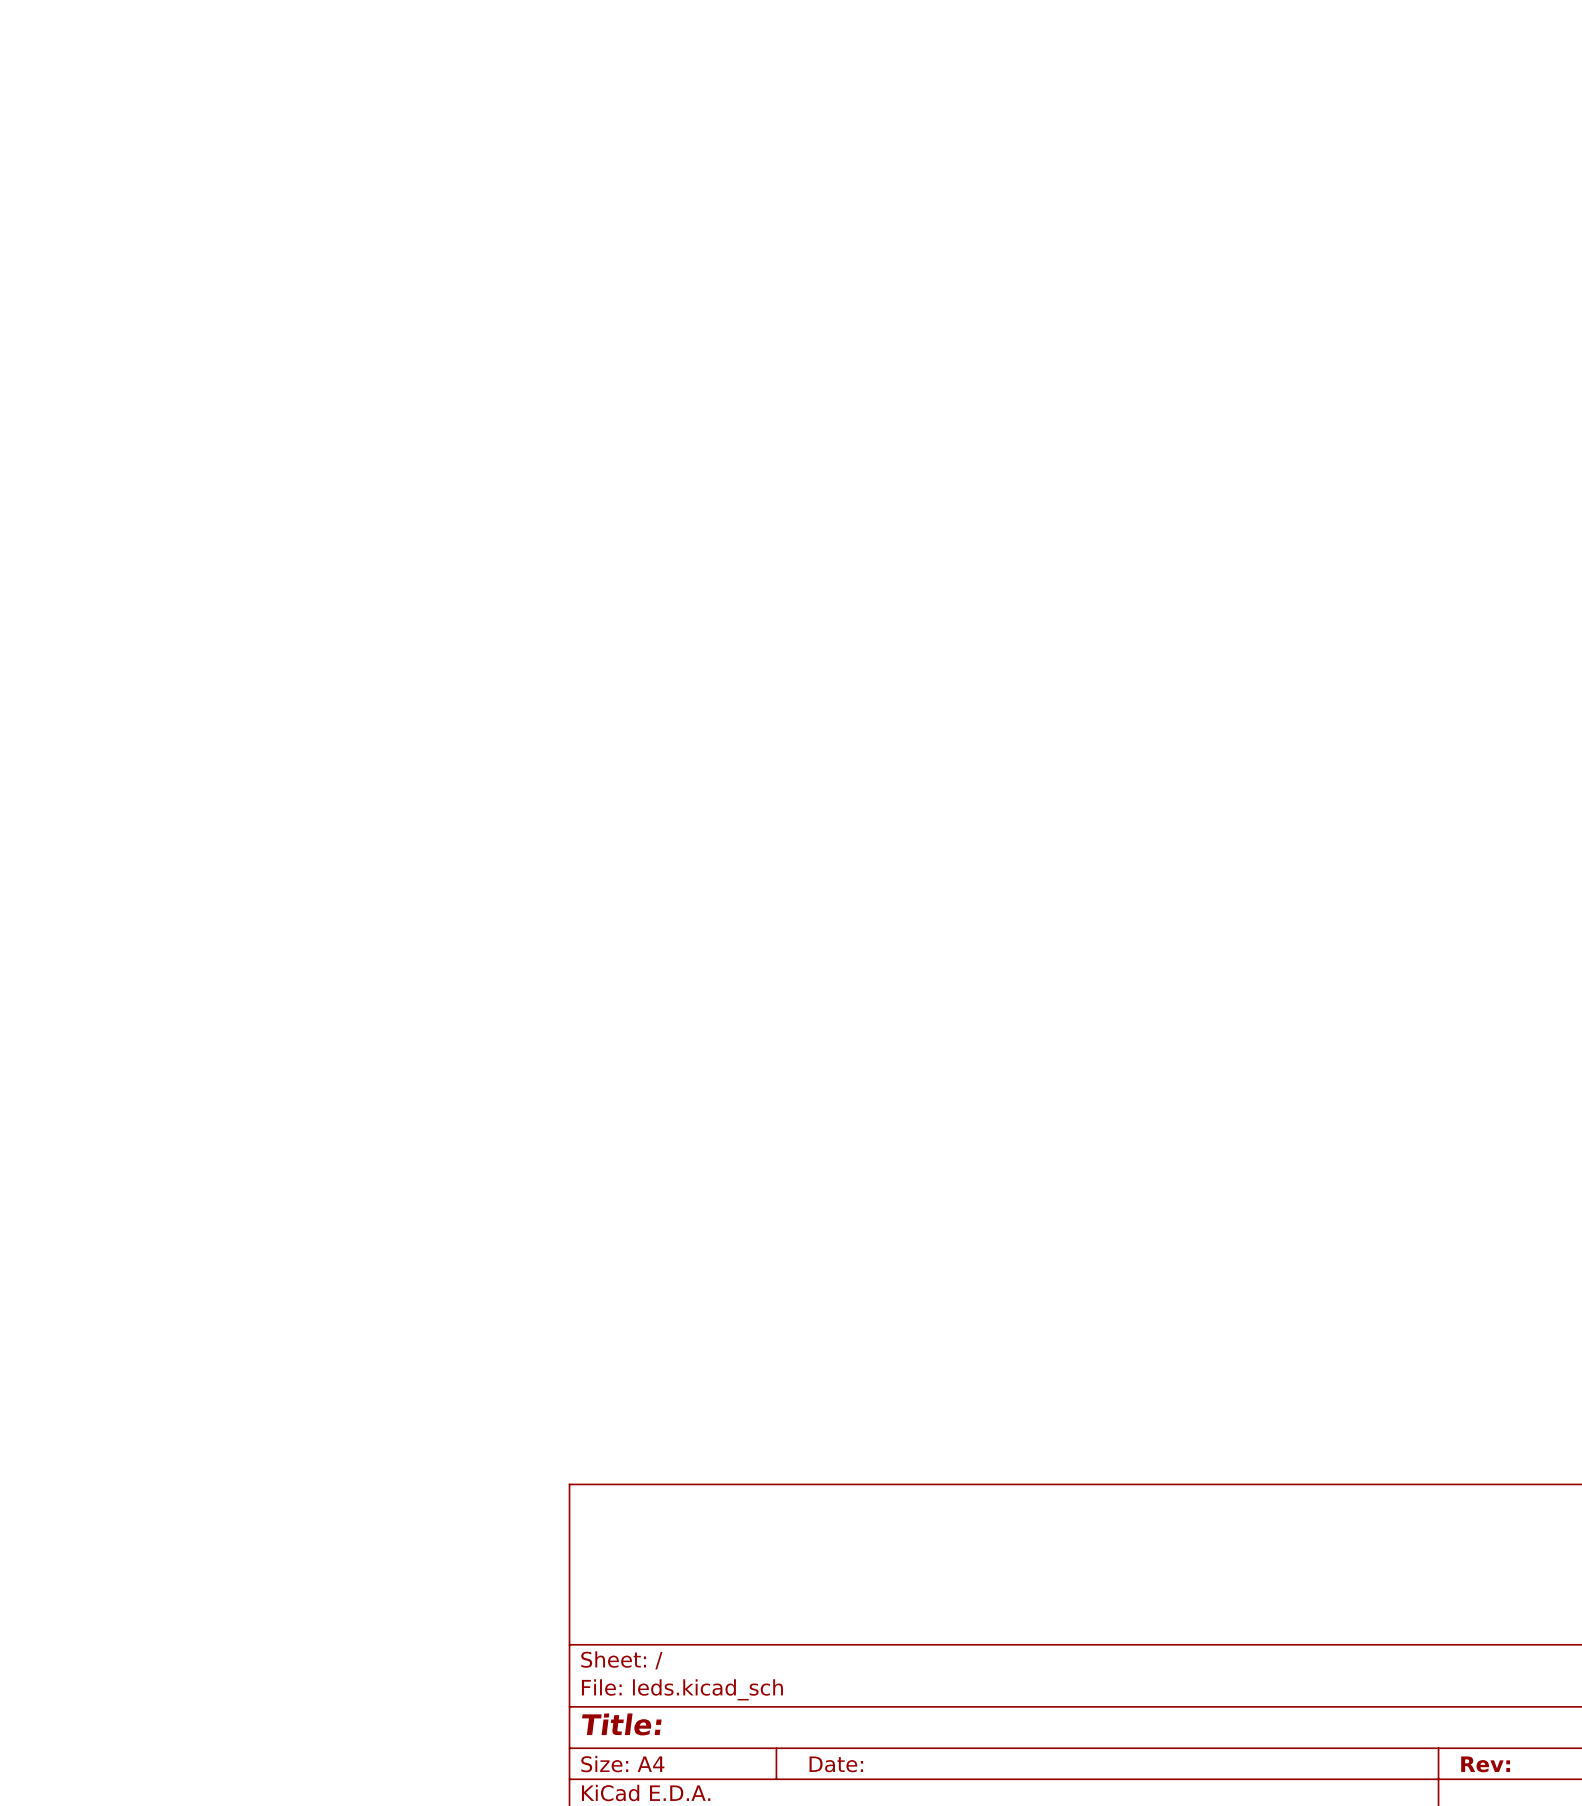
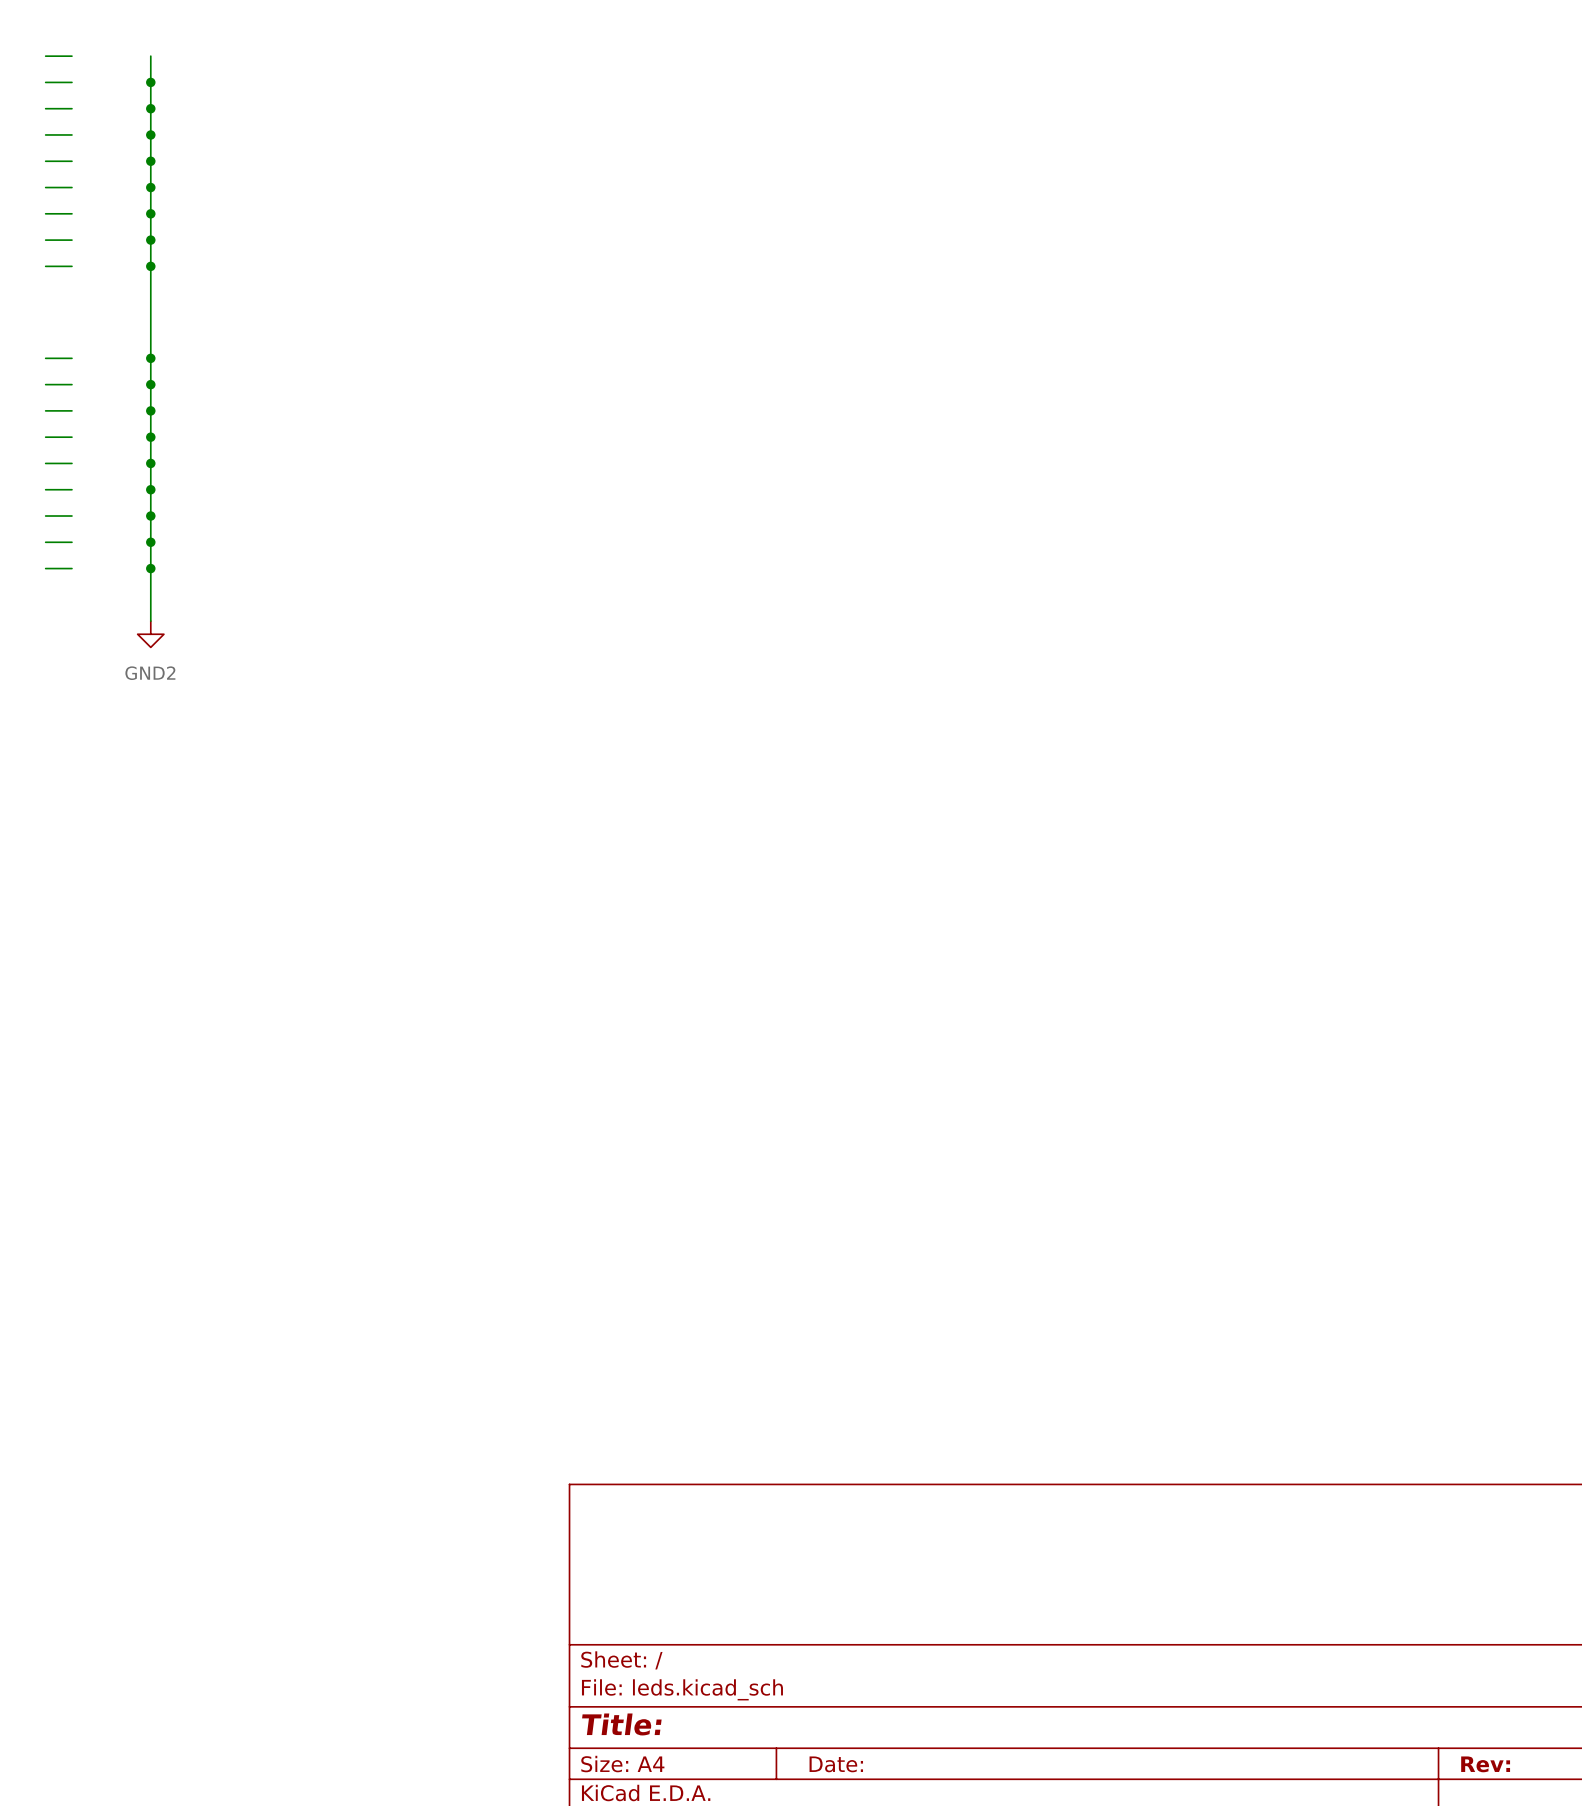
wire: none -> (45, 56) (71, 56)
wire: none -> (150, 56) (150, 621)
wire: none -> (45, 82) (71, 82)
junction: none -> (150, 82)
wire: none -> (45, 108) (71, 108)
junction: none -> (150, 108)
wire: none -> (45, 134) (71, 134)
junction: none -> (150, 134)
wire: none -> (45, 161) (71, 161)
junction: none -> (150, 161)
wire: none -> (45, 187) (71, 187)
junction: none -> (150, 187)
wire: none -> (45, 213) (71, 213)
junction: none -> (150, 213)
wire: none -> (45, 240) (71, 240)
junction: none -> (150, 240)
wire: none -> (45, 266) (71, 266)
junction: none -> (150, 266)
wire: none -> (45, 358) (71, 358)
junction: none -> (150, 358)
wire: none -> (45, 384) (71, 384)
junction: none -> (150, 384)
wire: none -> (45, 410) (71, 410)
junction: none -> (150, 410)
wire: none -> (45, 437) (71, 437)
junction: none -> (150, 437)
wire: none -> (45, 463) (71, 463)
junction: none -> (150, 463)
wire: none -> (45, 489) (71, 489)
junction: none -> (150, 489)
wire: none -> (45, 516) (71, 516)
junction: none -> (150, 516)
wire: none -> (45, 542) (71, 542)
junction: none -> (150, 542)
wire: none -> (45, 568) (71, 568)
junction: none -> (150, 568)
power symbol: none -> GND2 (150, 634)

